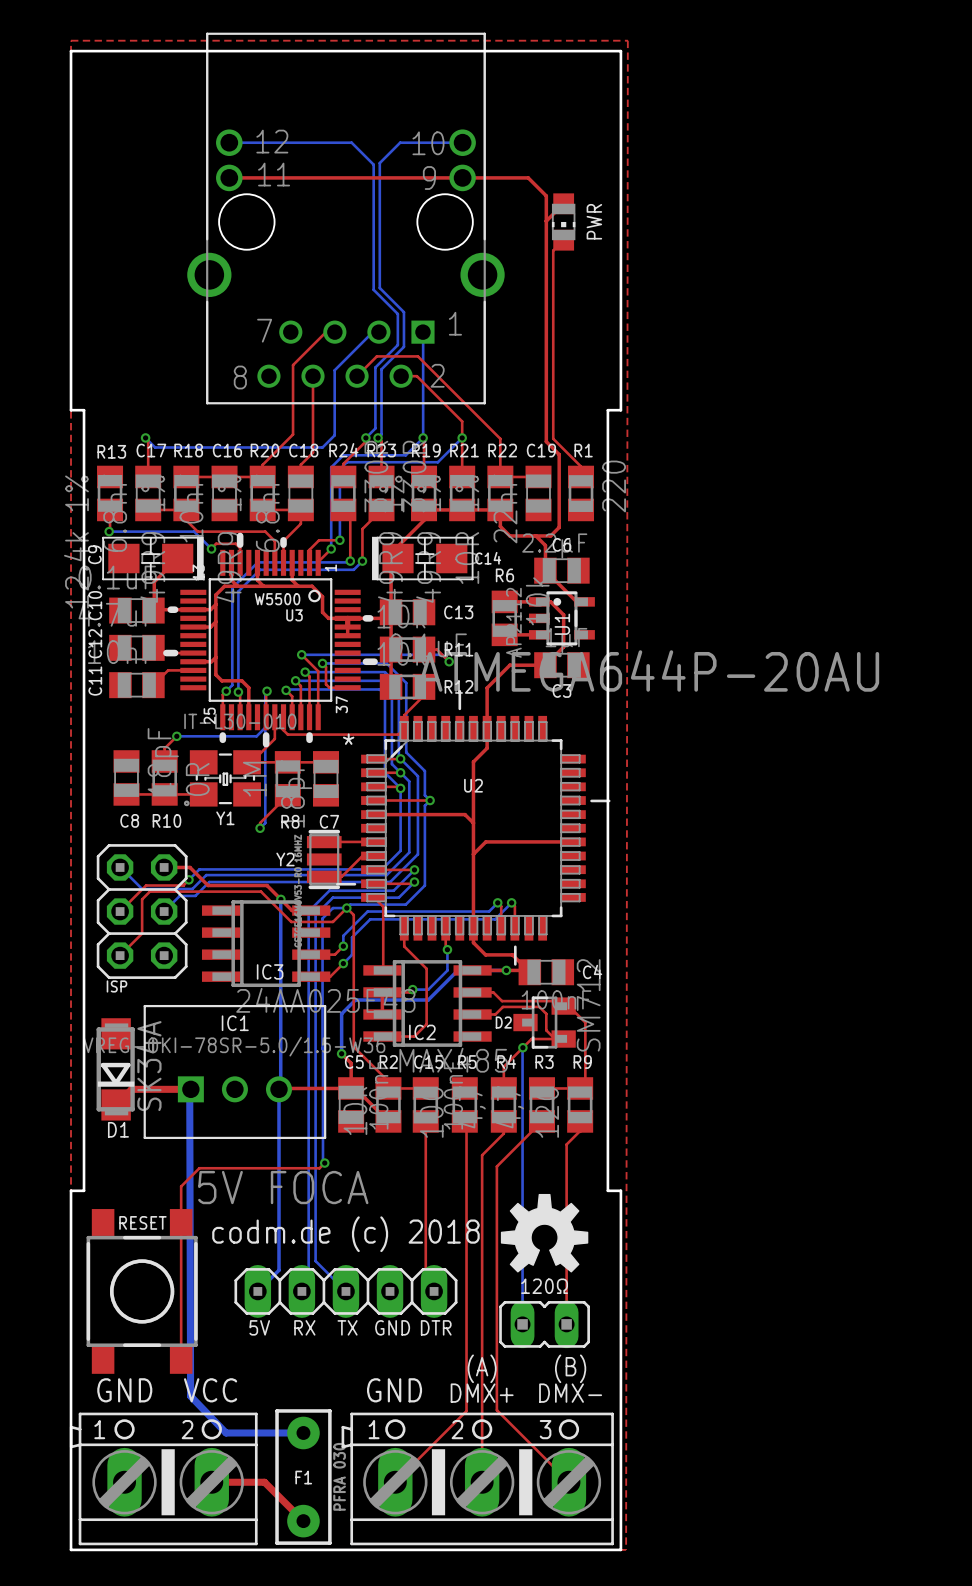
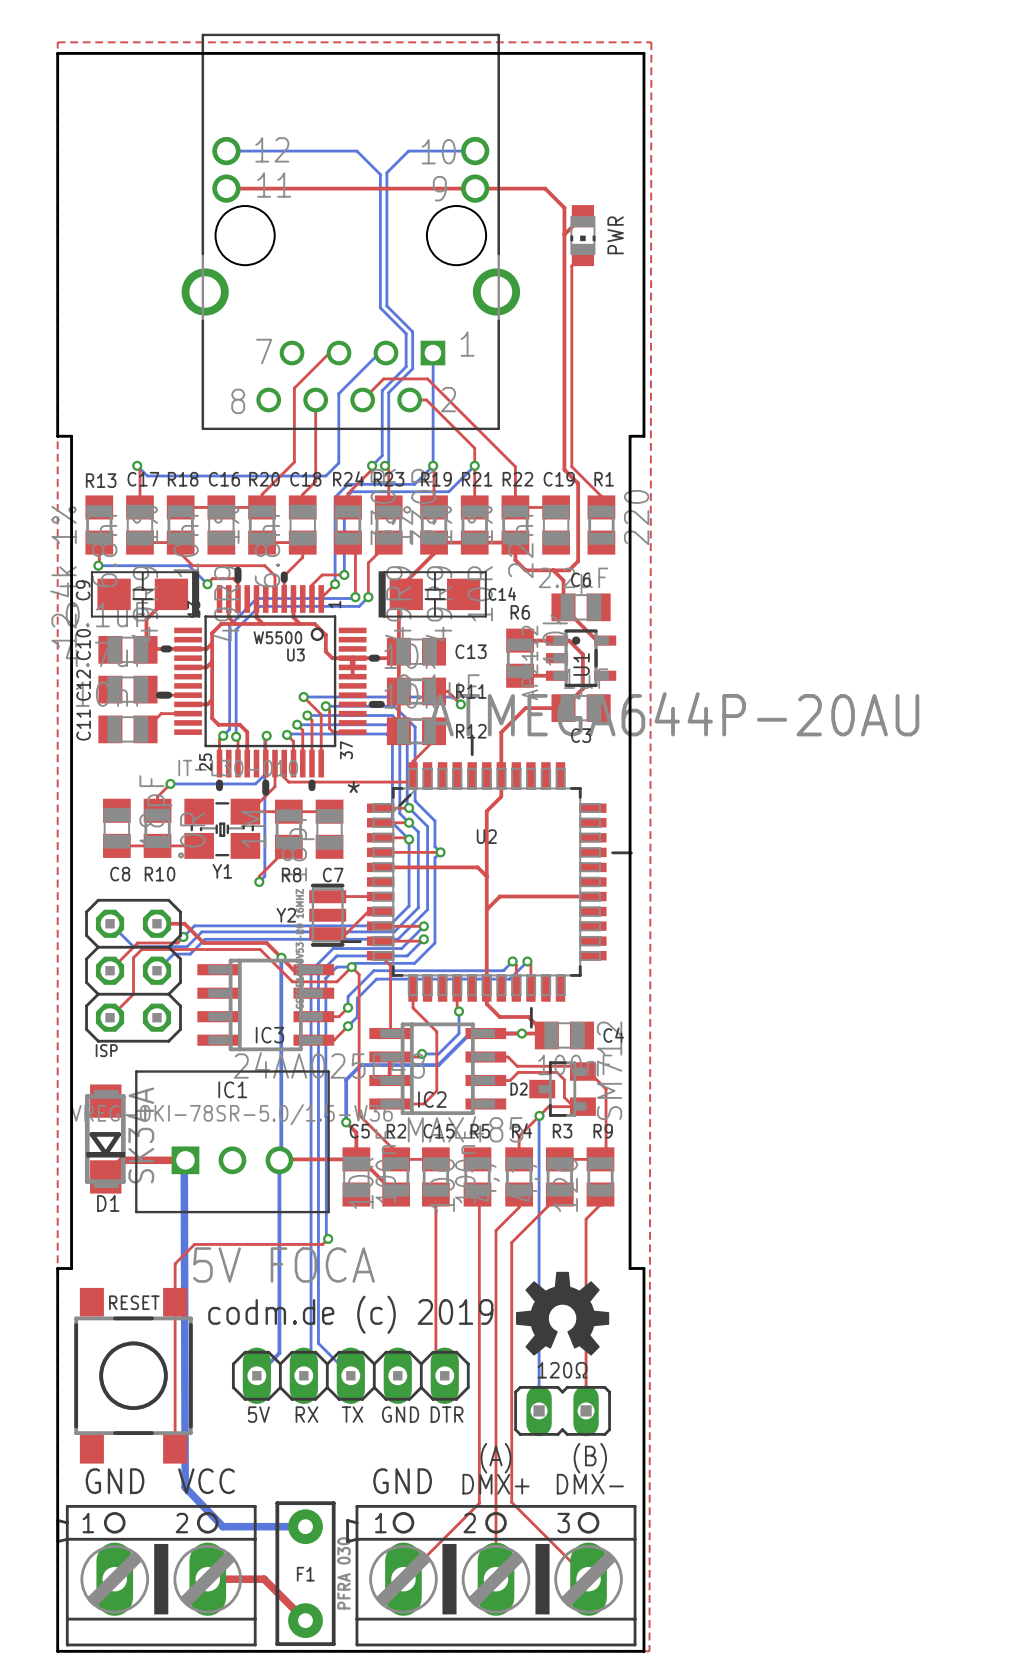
text: codm.de (c) 2018 (345, 1234) -> codm.de (c) 2019 (350, 1314)

